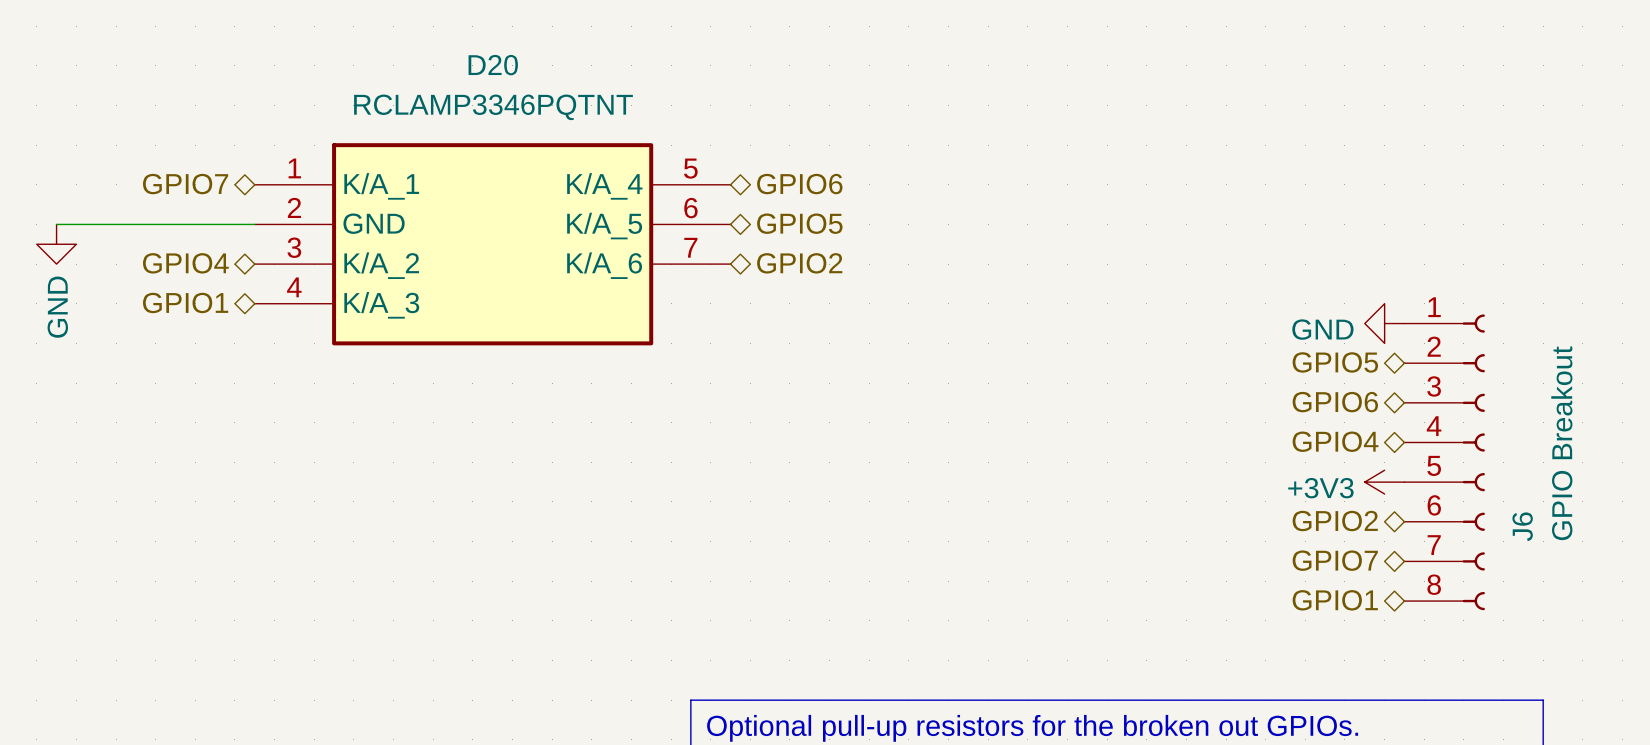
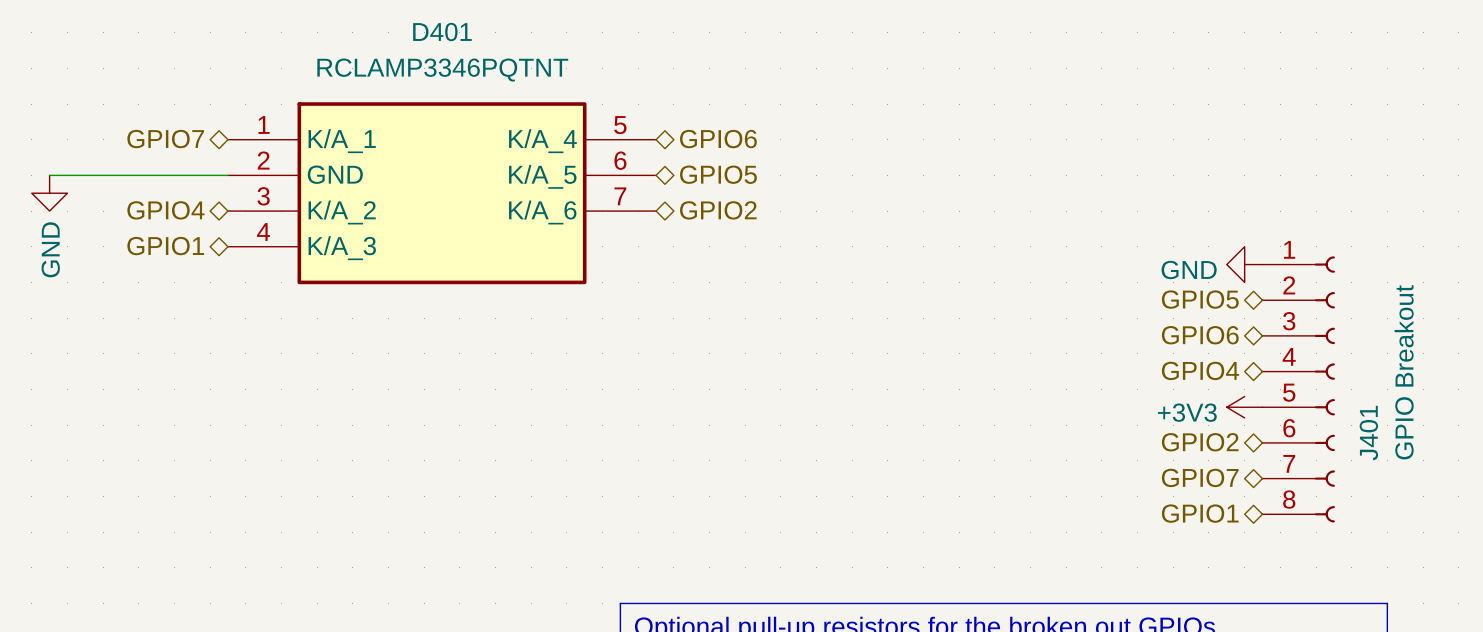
D20 name: D20 (493, 65) -> D401 (442, 32)
J6 name: J6 (1522, 526) -> J401 (1368, 433)

